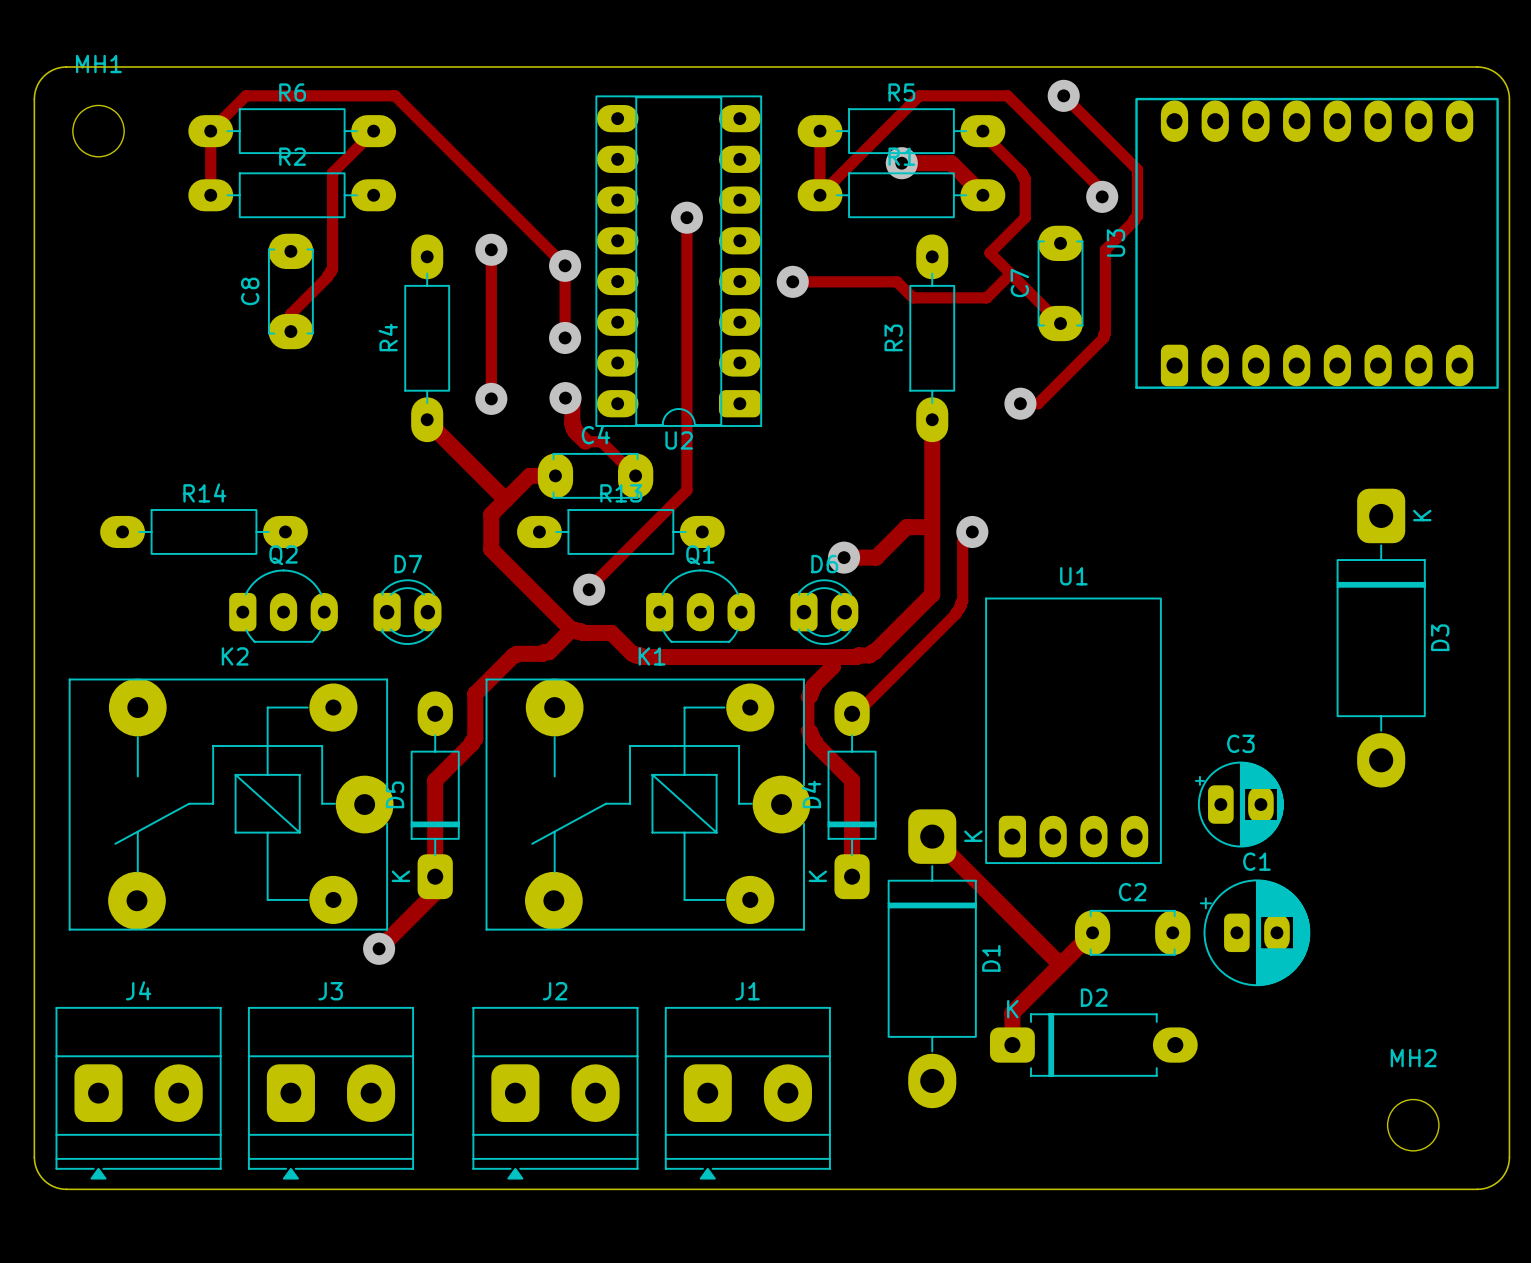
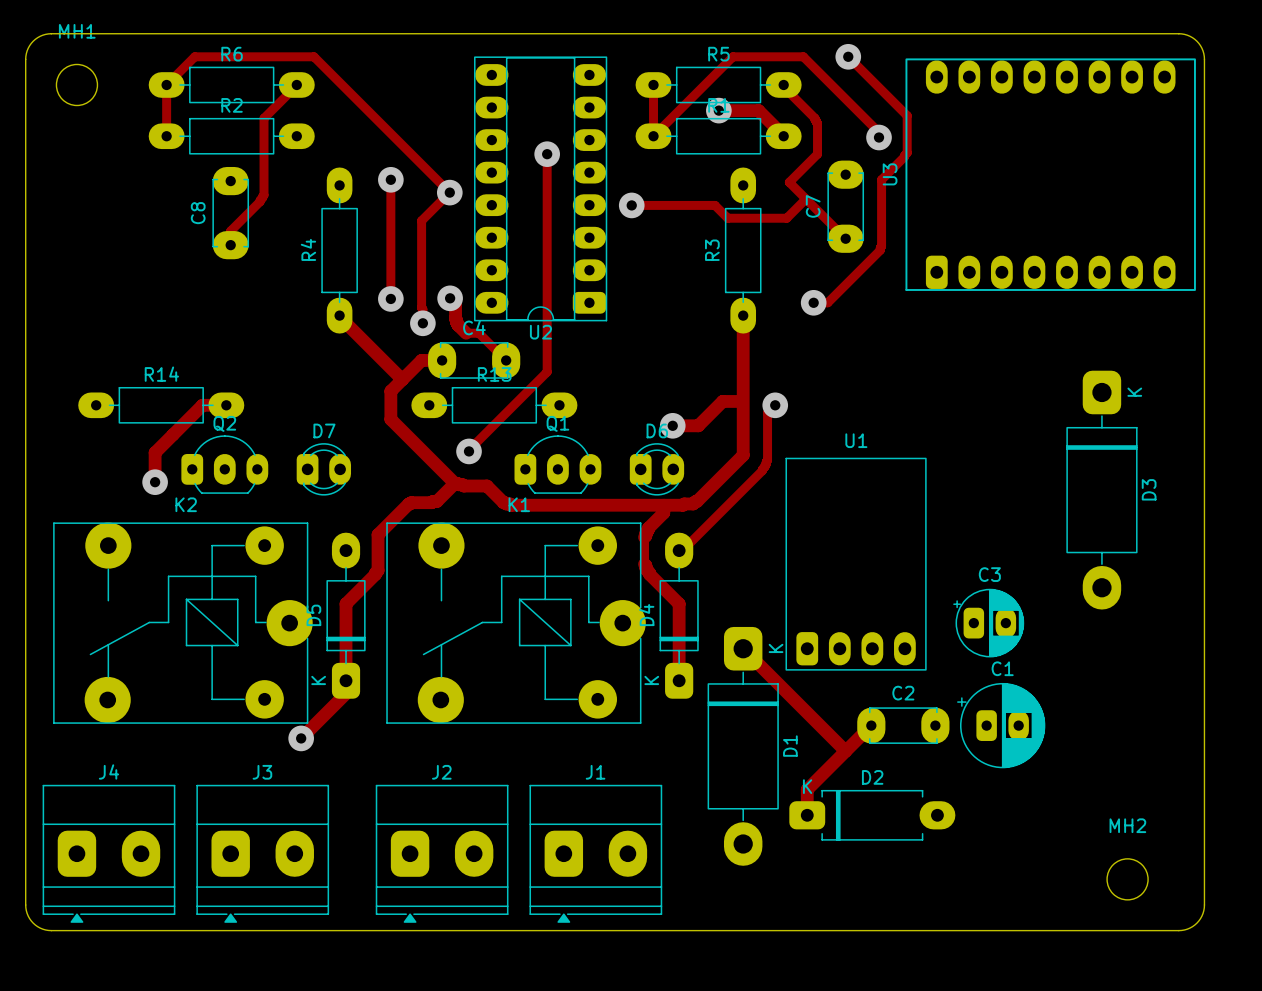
track: (565, 265) (565, 337) -> (449, 192) (421, 220) (422, 323)
via: (565, 337) -> none
via: none -> (422, 323)
track: none -> (226, 405) (202, 405) (155, 452) (155, 482)
via: none -> (155, 482)

